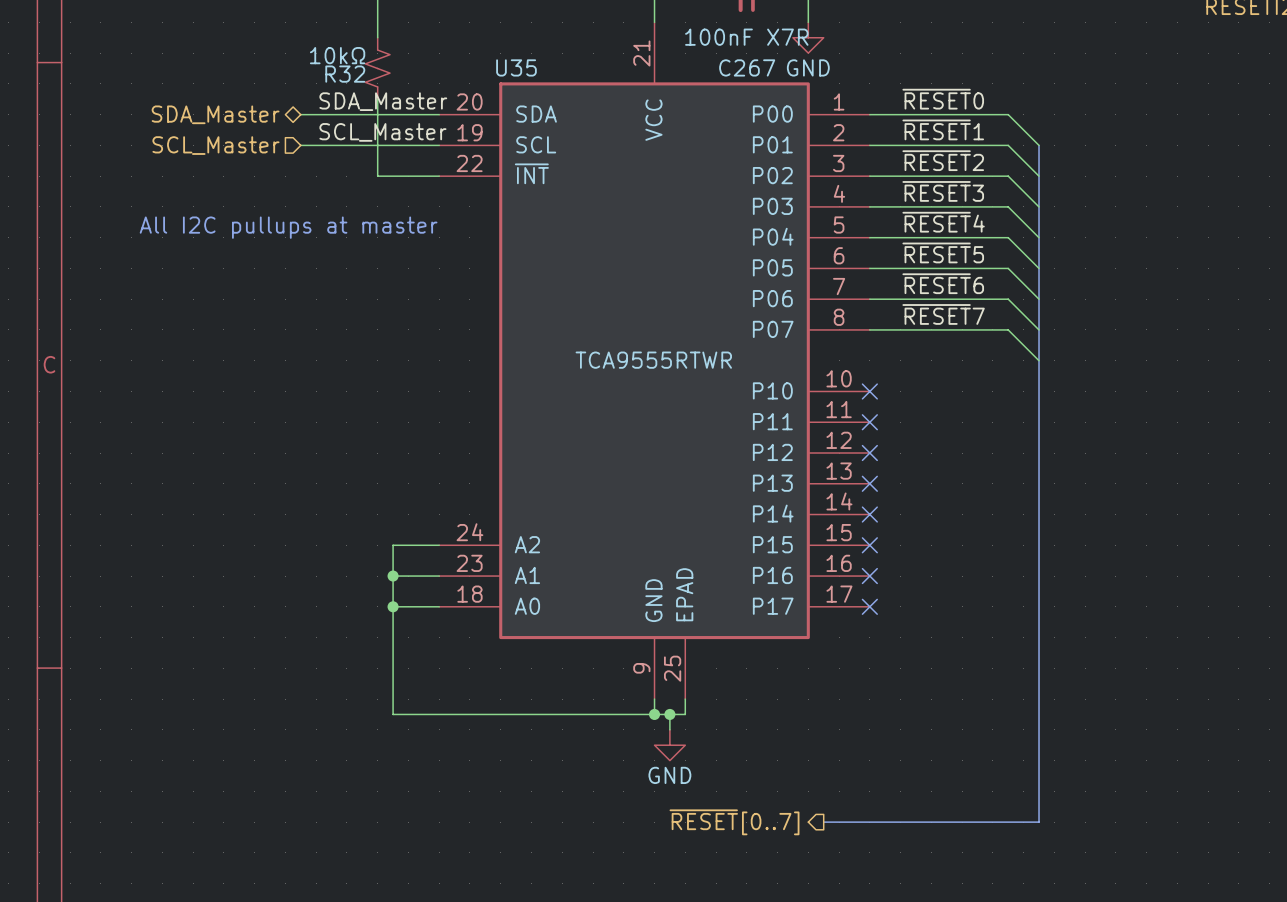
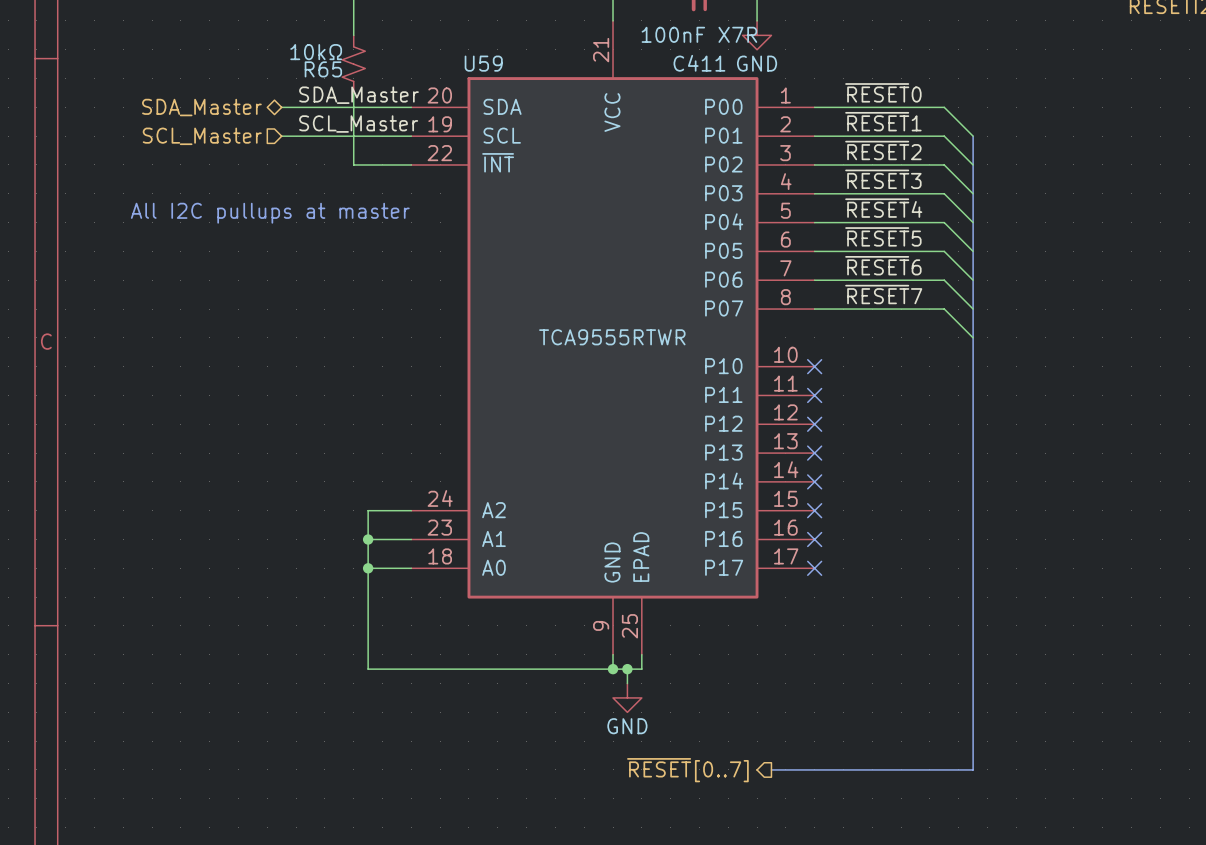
U35 name: U35 (516, 67) -> U59 (483, 63)
C267 name: C267 (747, 67) -> C411 (699, 63)
R32 name: R32 (345, 74) -> R65 (323, 69)

